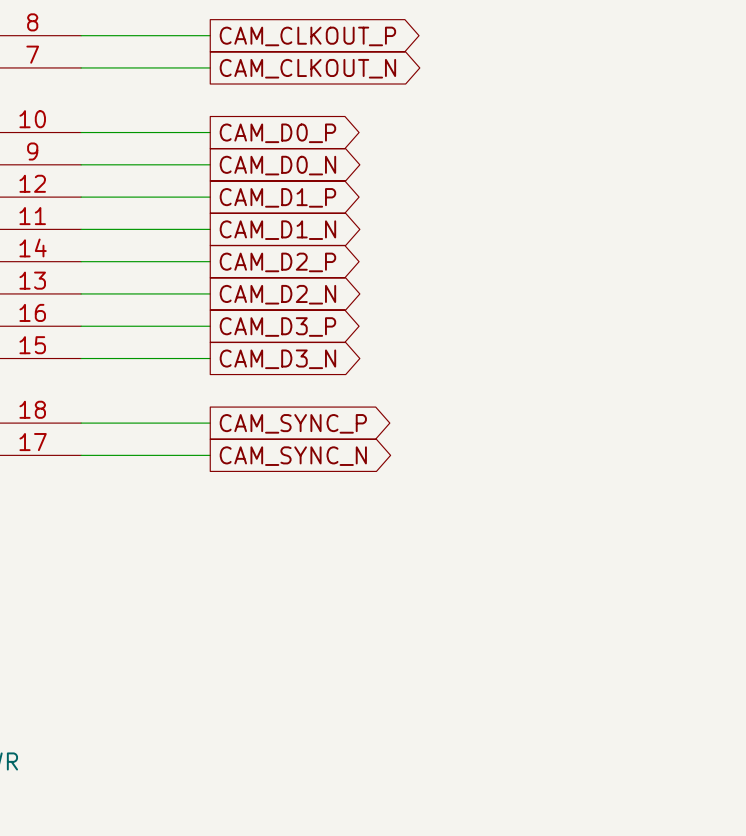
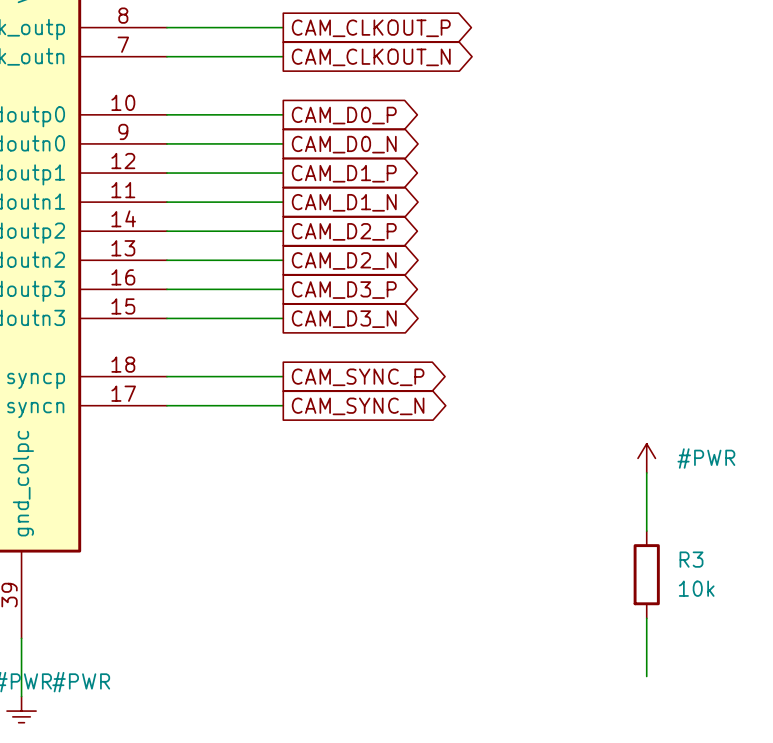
#PWR: none -> (646, 458)
wire: none -> (646, 472) (646, 531)
R3: none -> 10k (646, 574)
wire: none -> (646, 618) (646, 676)

